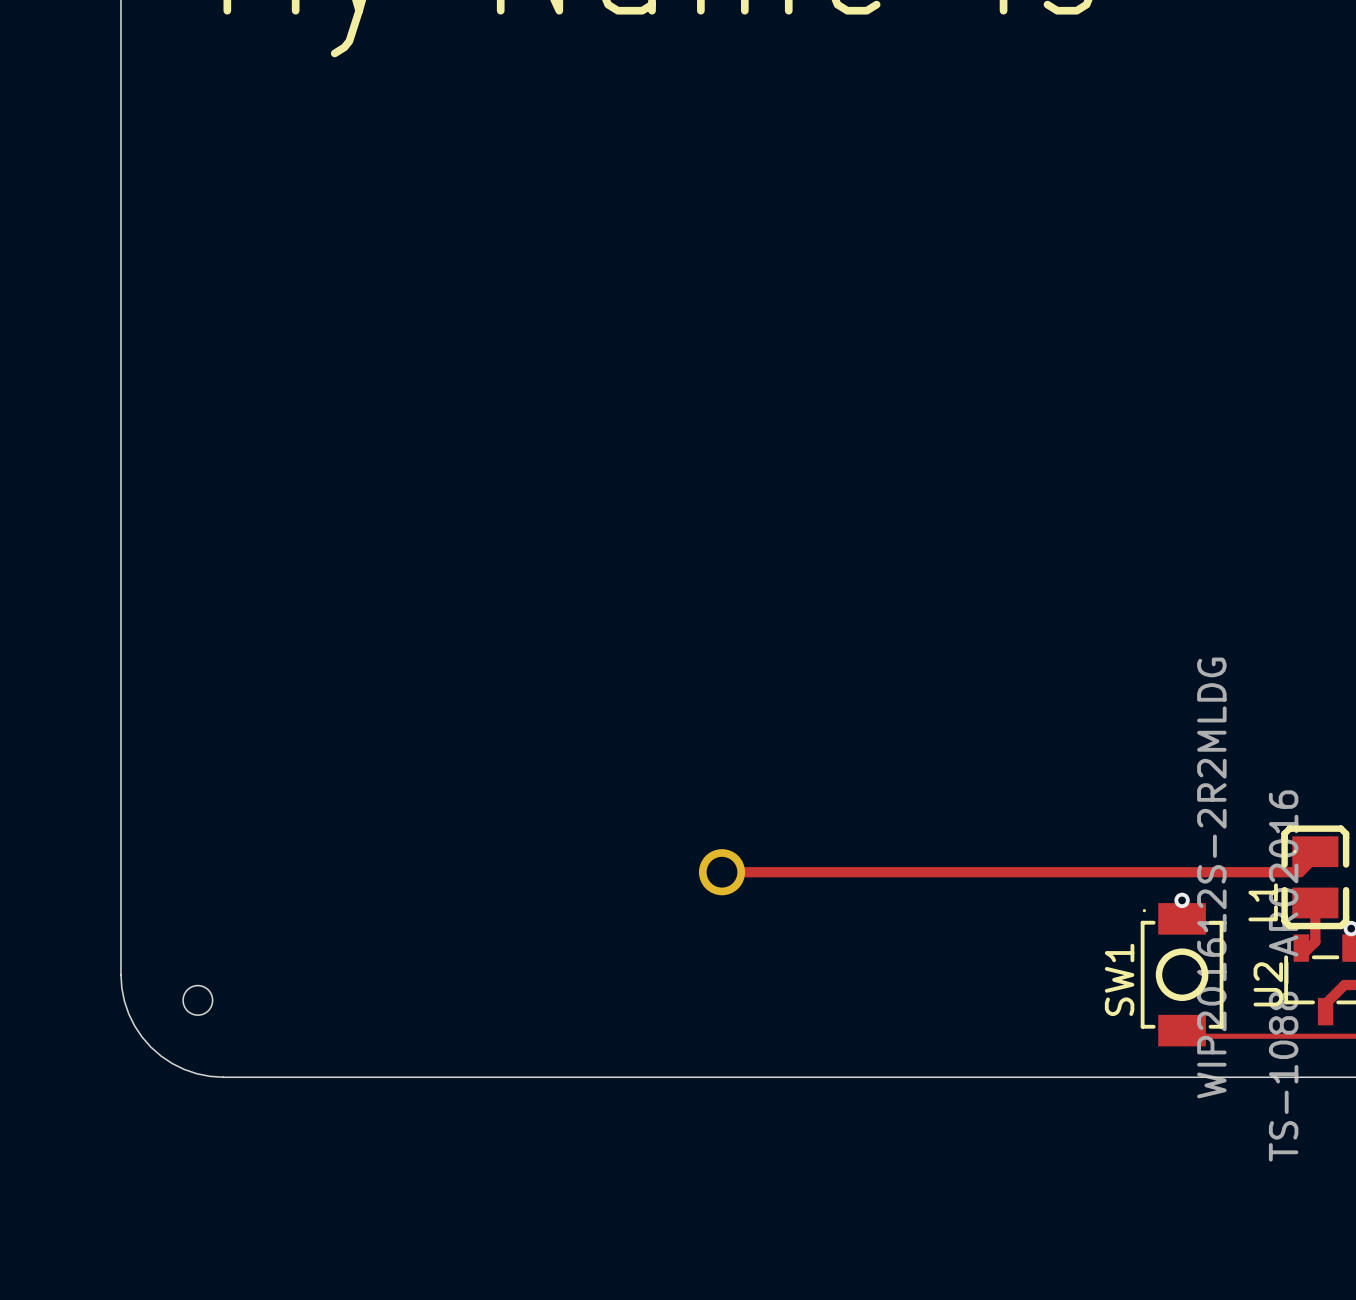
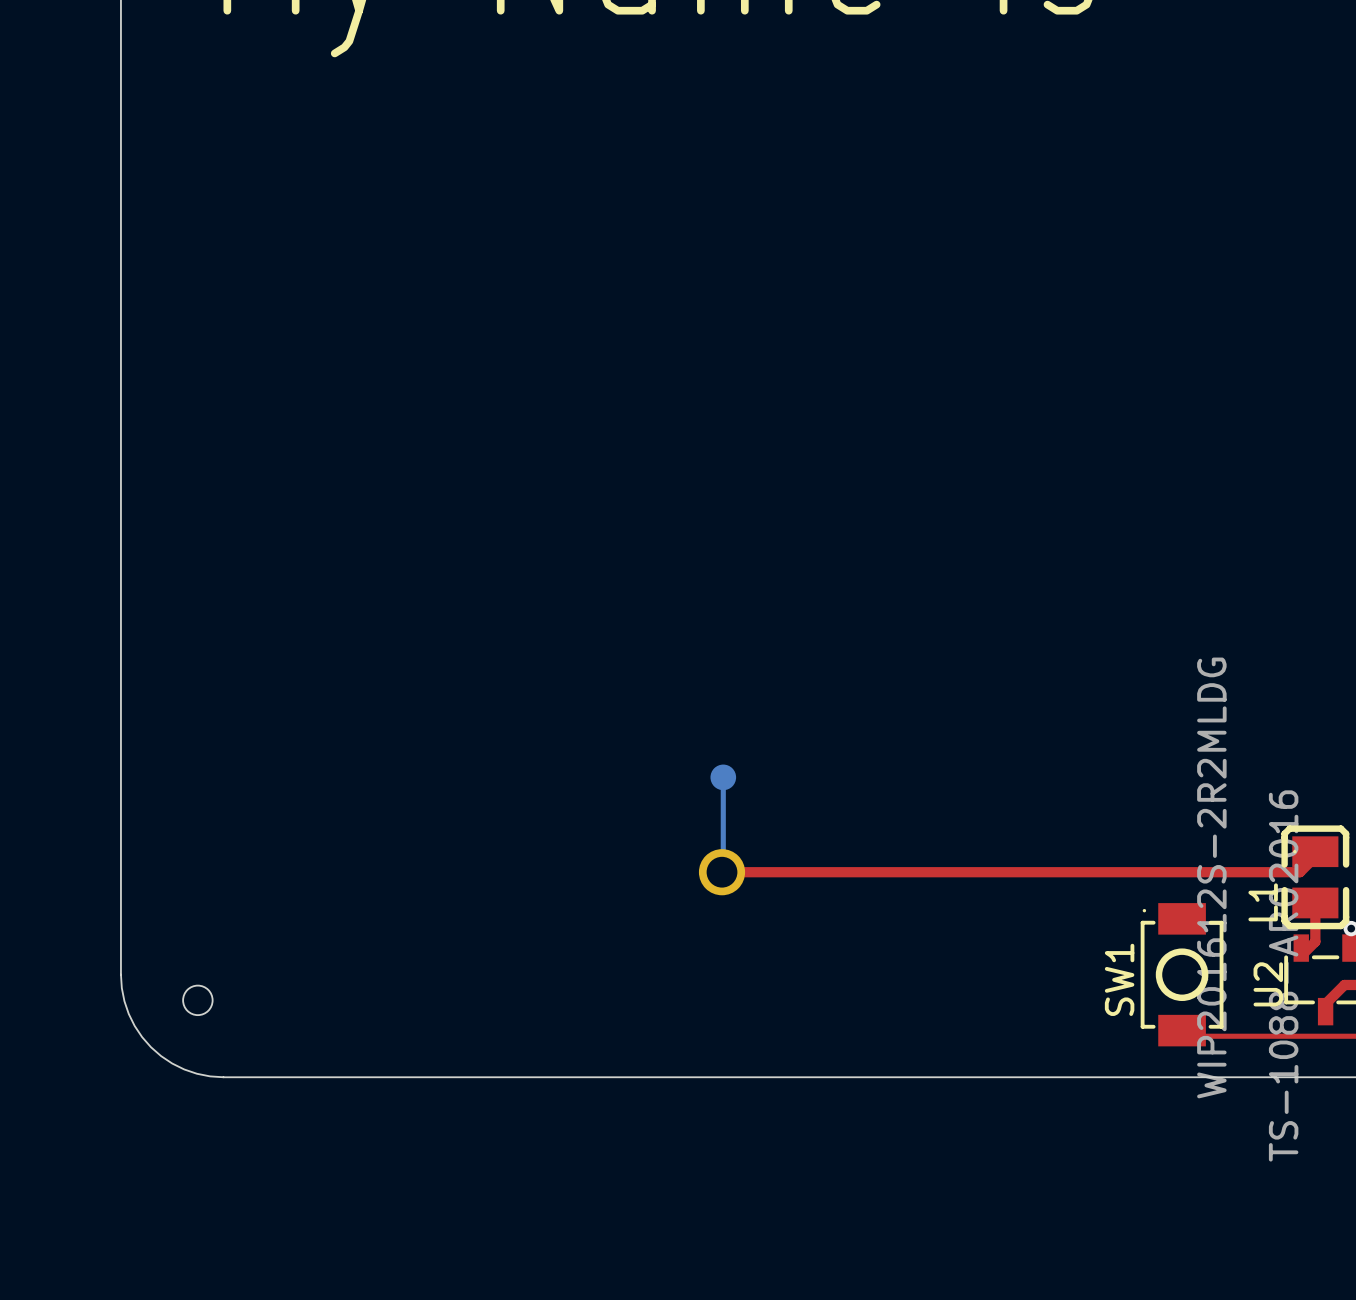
bottom track: none -> (723, 777) (723, 870)
part: none -> (723, 777)
via: (1182, 900) -> none

